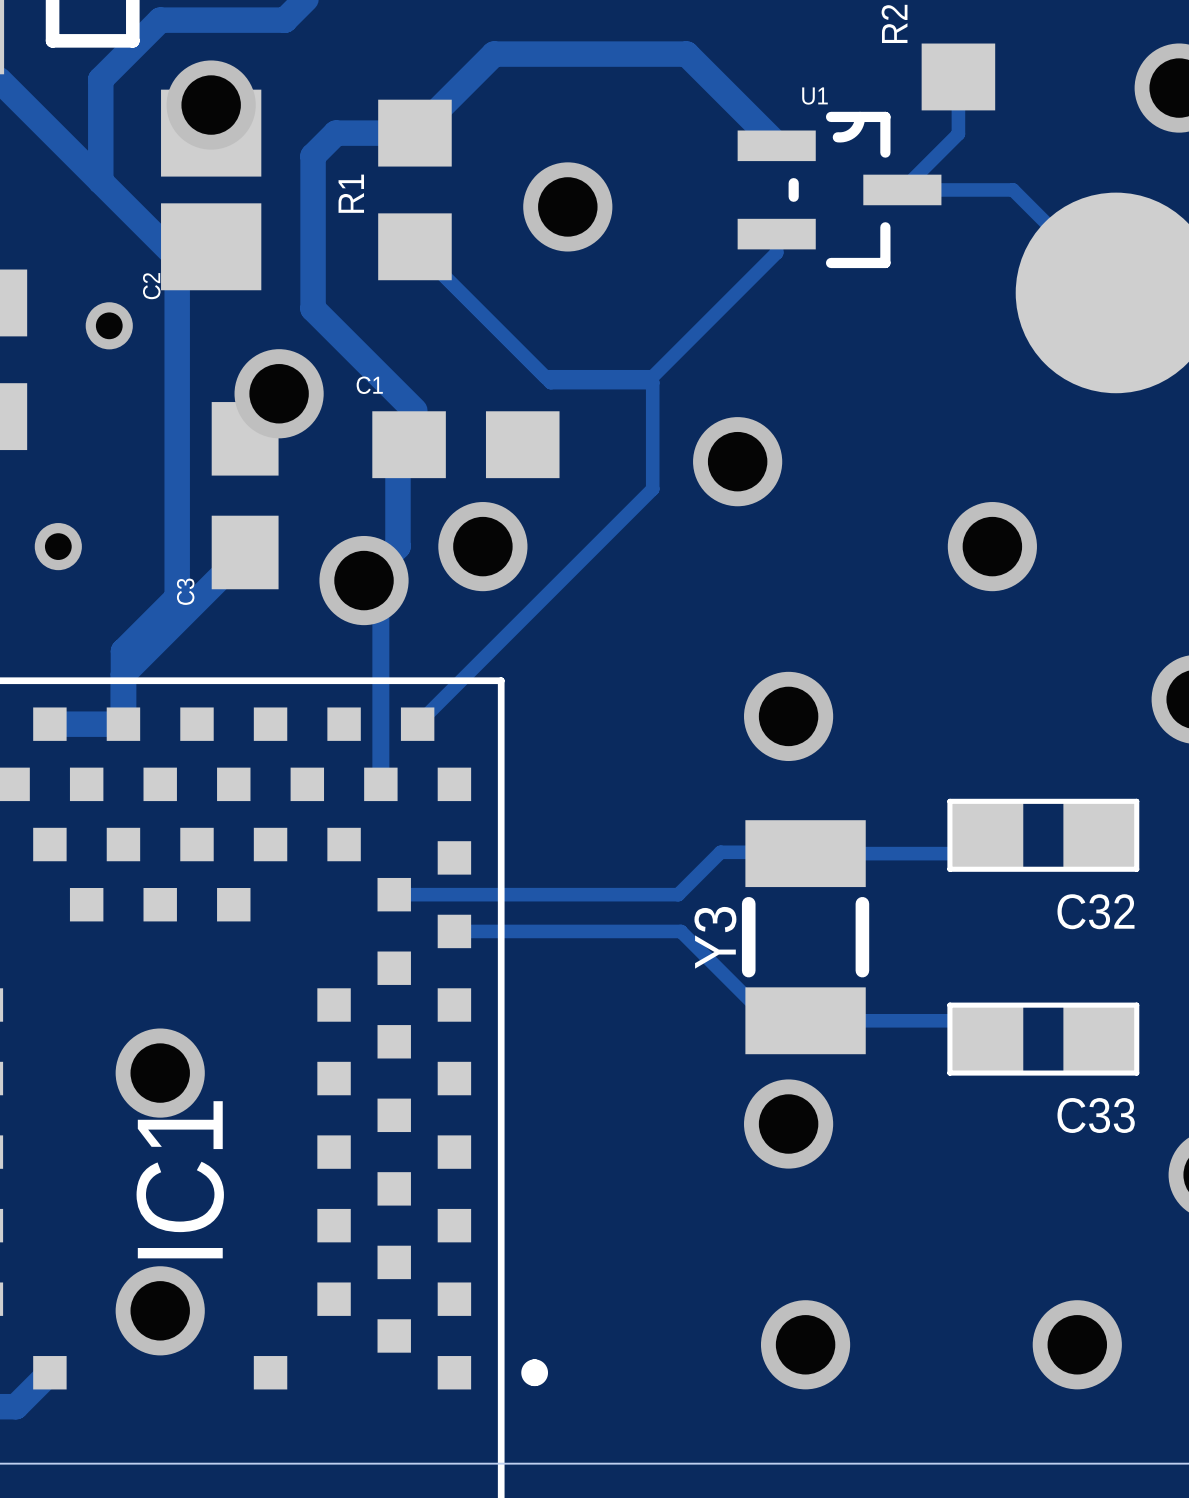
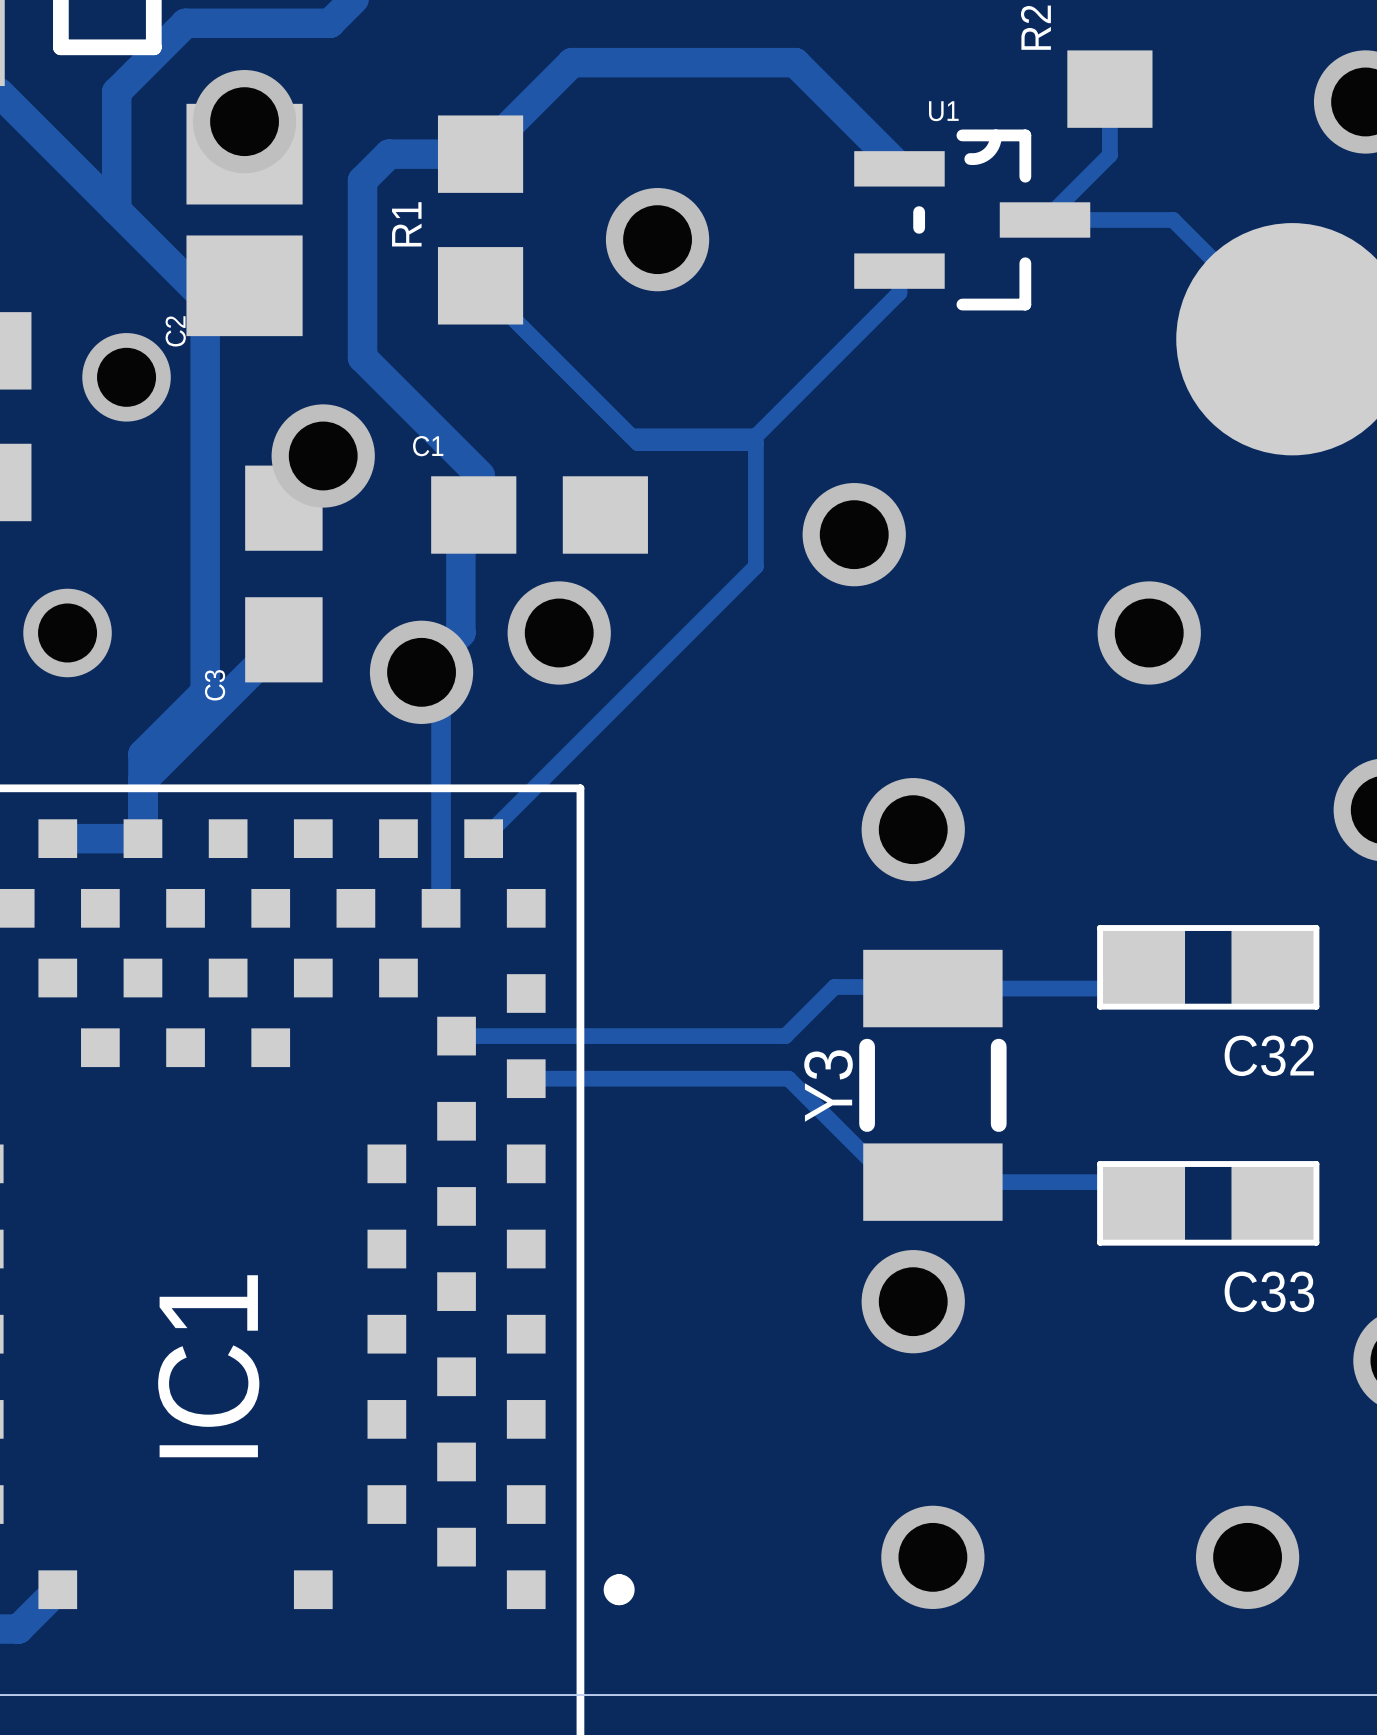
via size: [85, 302, 133, 350] -> [82, 333, 171, 422]
via size: [34, 523, 82, 571] -> [23, 588, 112, 678]
via: (160, 1073) -> none
via: (160, 1310) -> none

